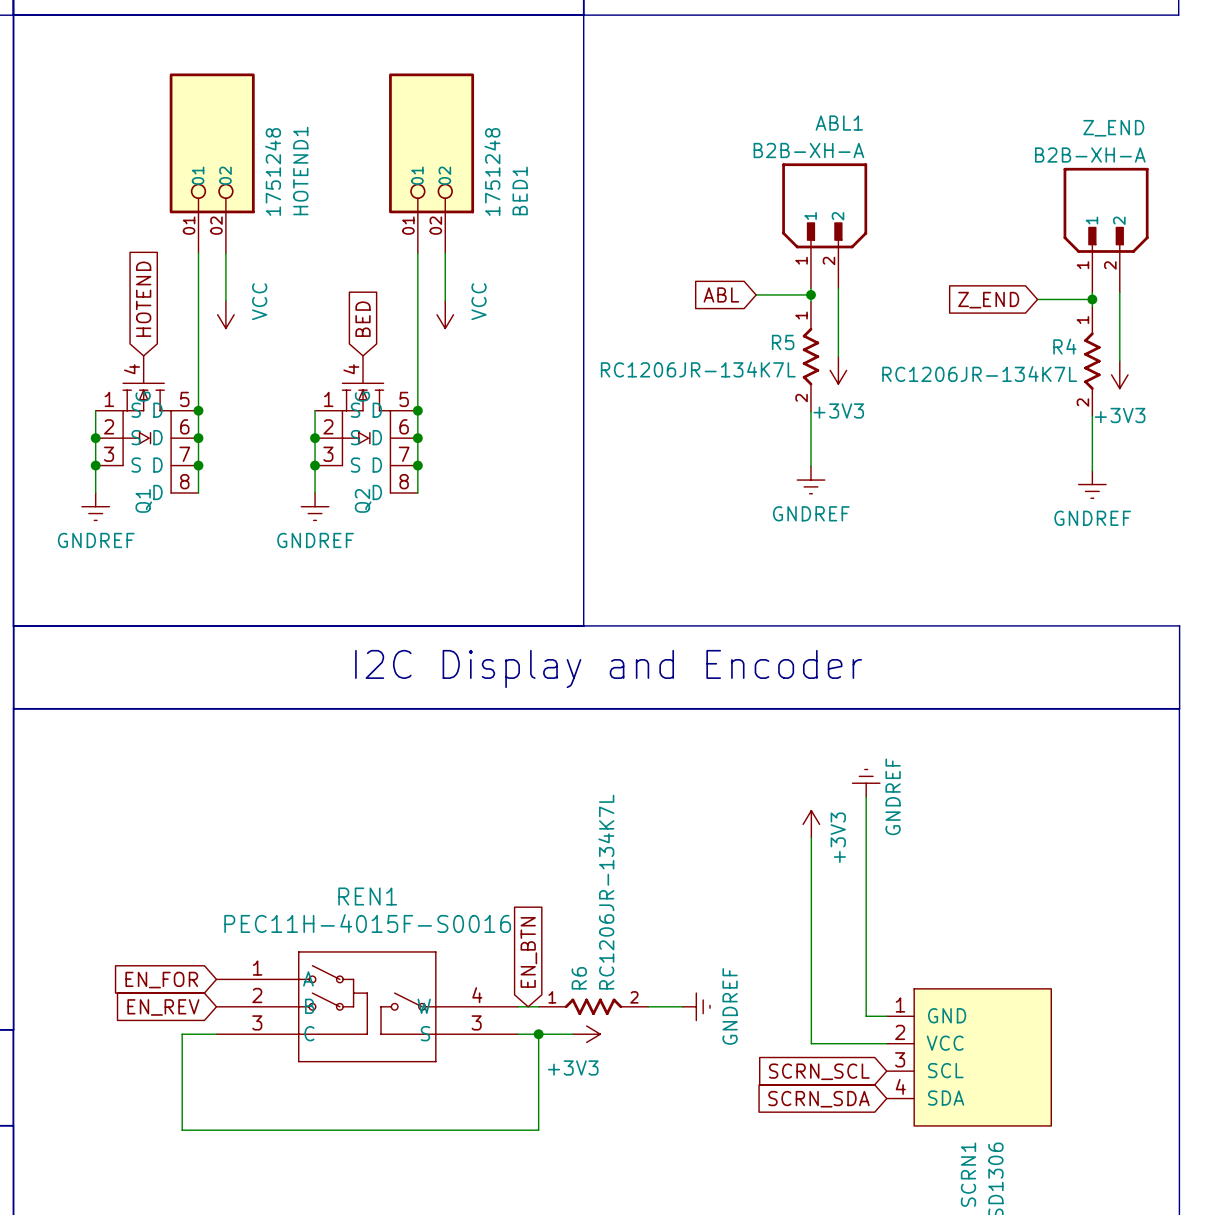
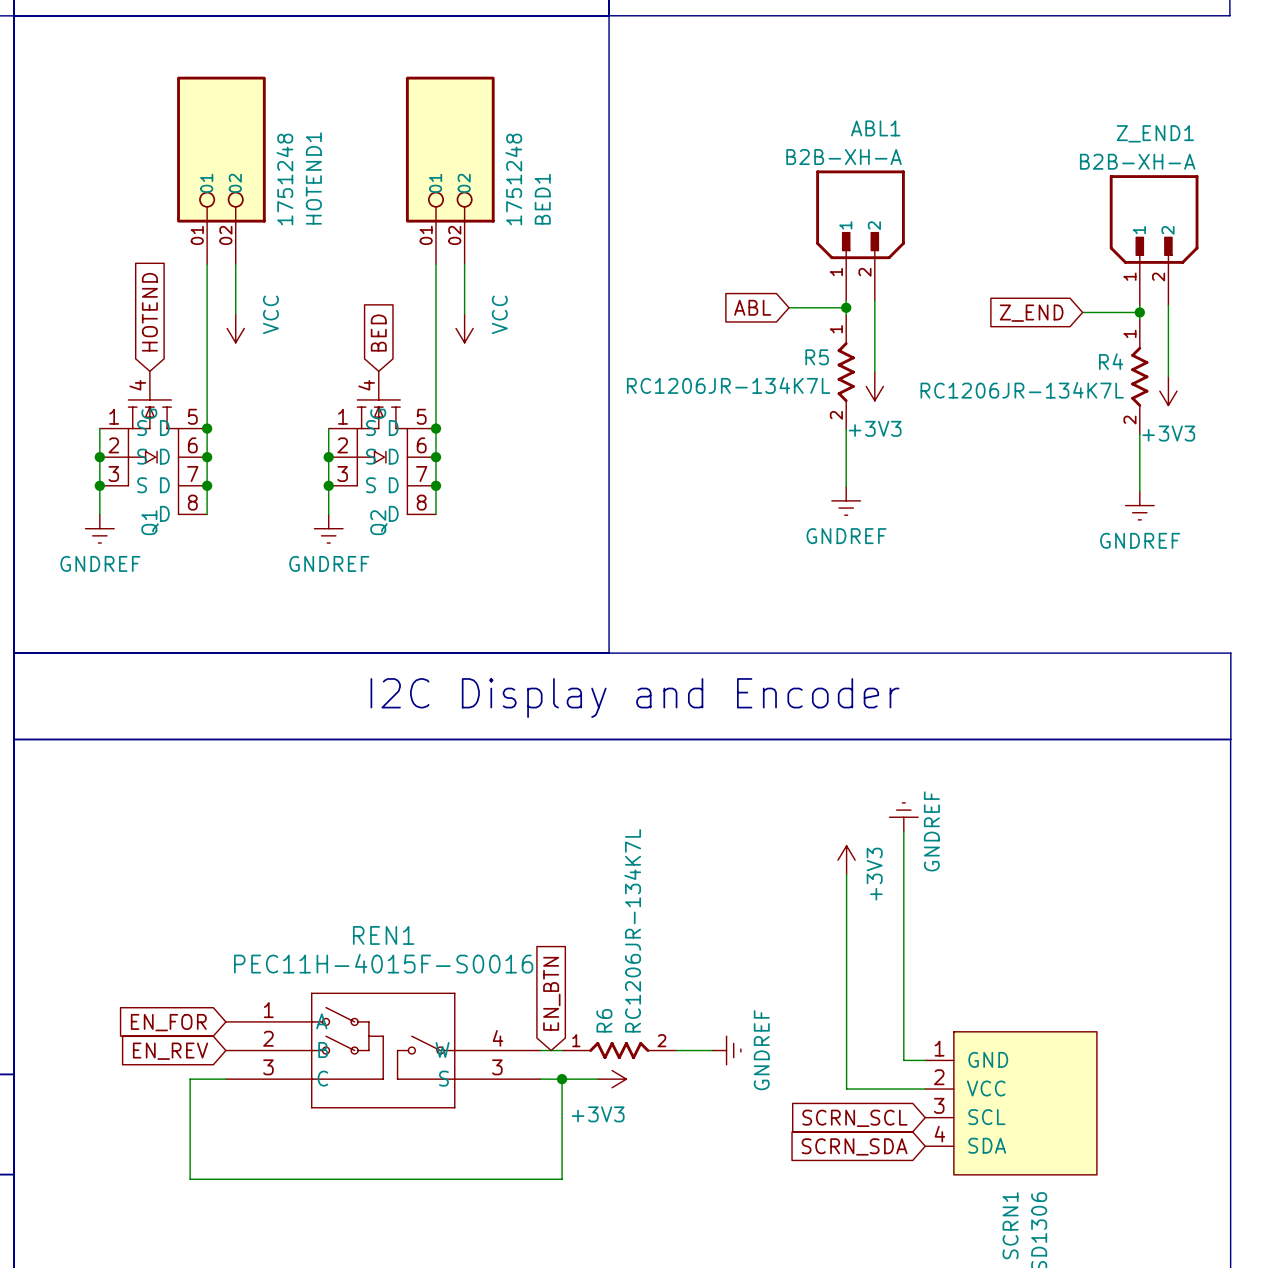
Z_END name: Z_END (1113, 128) -> Z_END1 (1155, 133)

